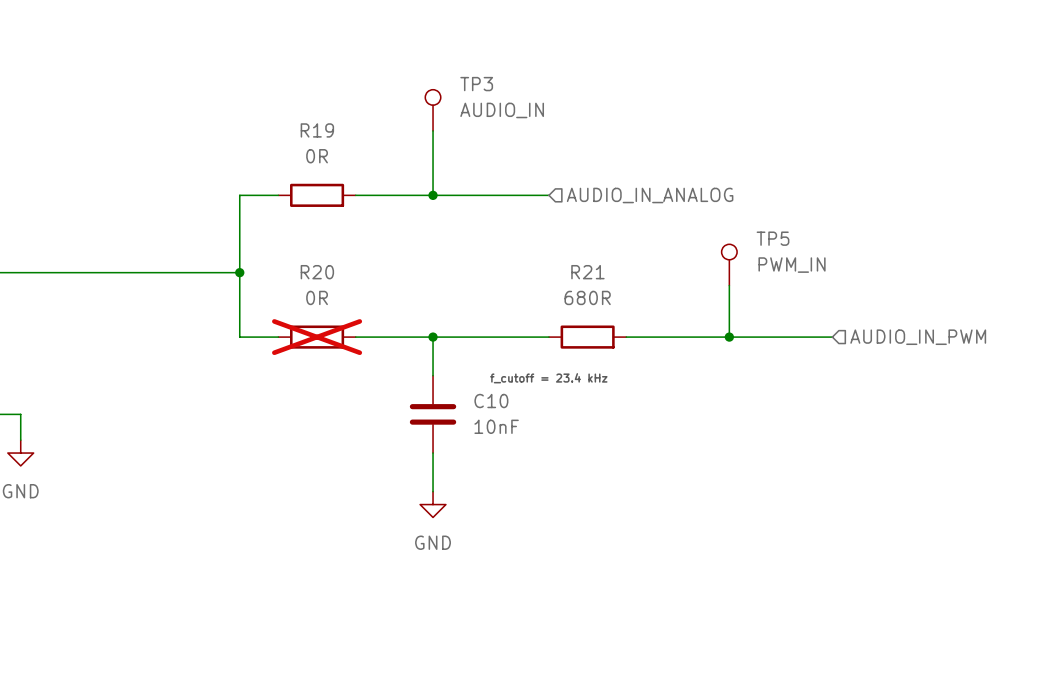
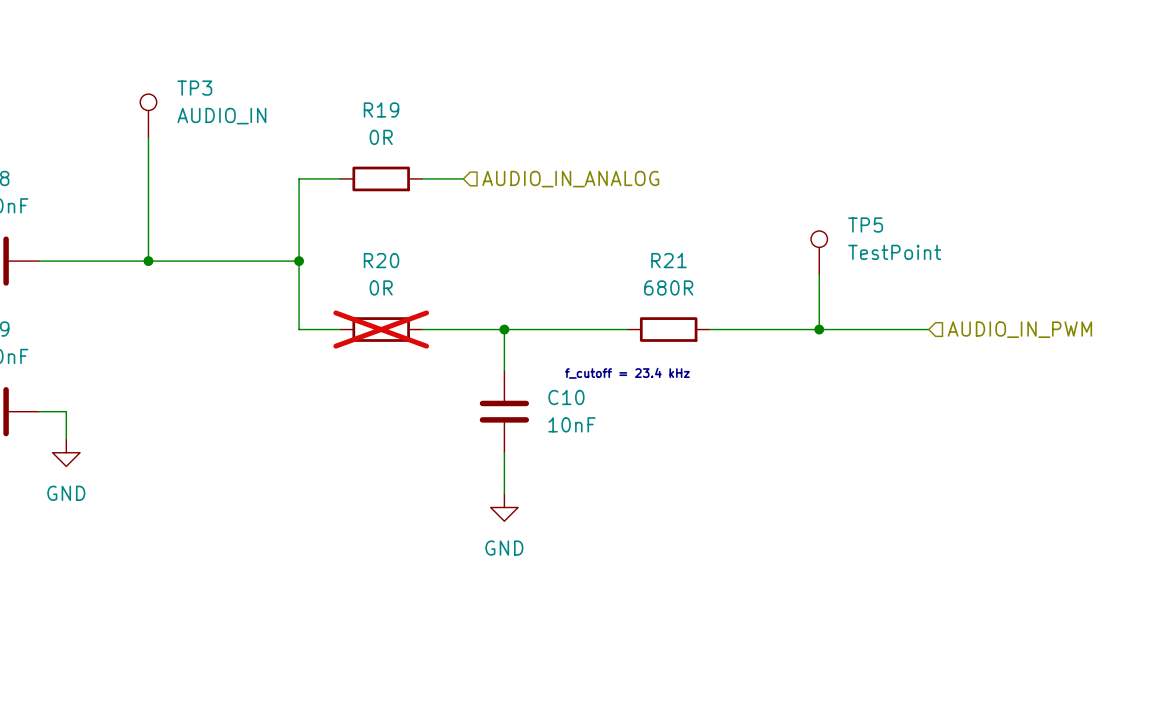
TP3 position: (433, 110) -> (148, 115)
wire: (433, 130) (433, 195) -> none
wire: none -> (148, 137) (148, 261)
wire: (394, 195) (548, 195) -> none
junction: (433, 195) -> none
hierarchical label position: AUDIO_IN_ANALOG (650, 195) -> AUDIO_IN_ANALOG (570, 179)
TP5 value: PWM_IN (792, 265) -> TestPoint (894, 252)
junction: none -> (148, 261)

